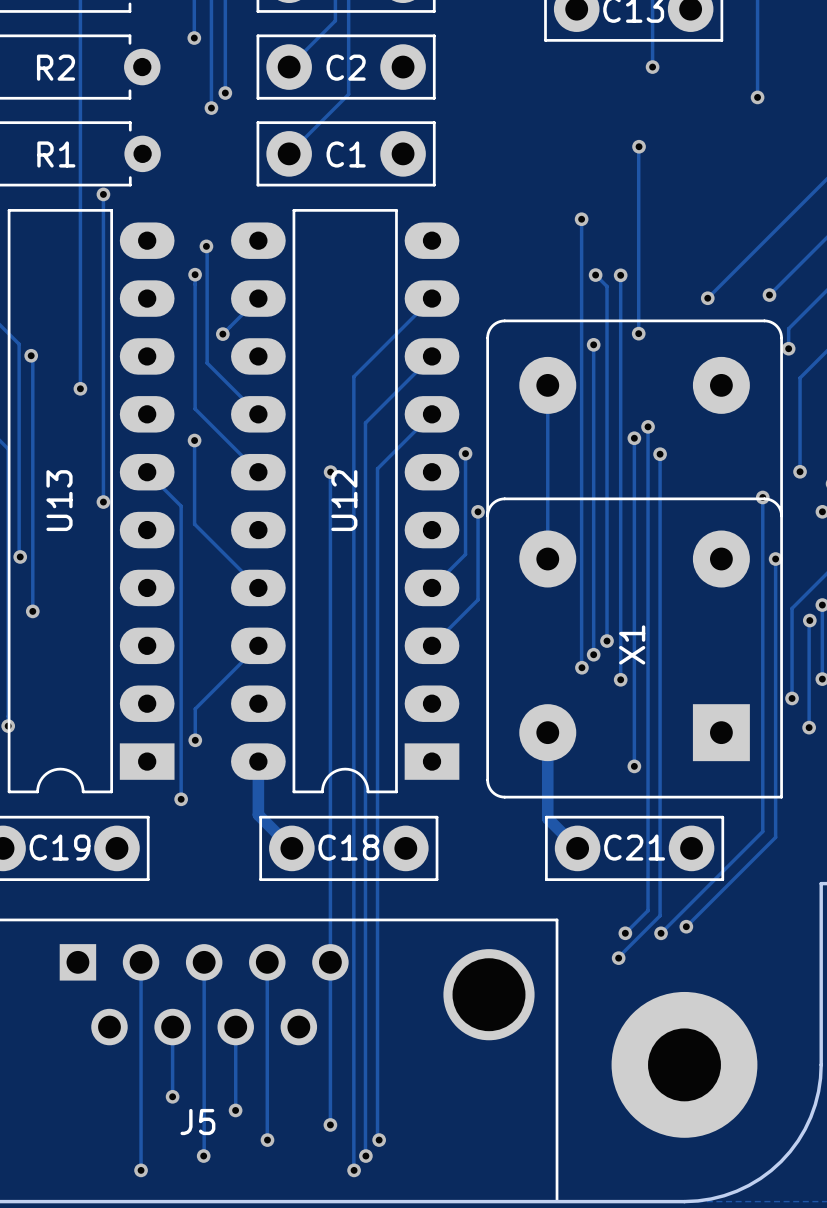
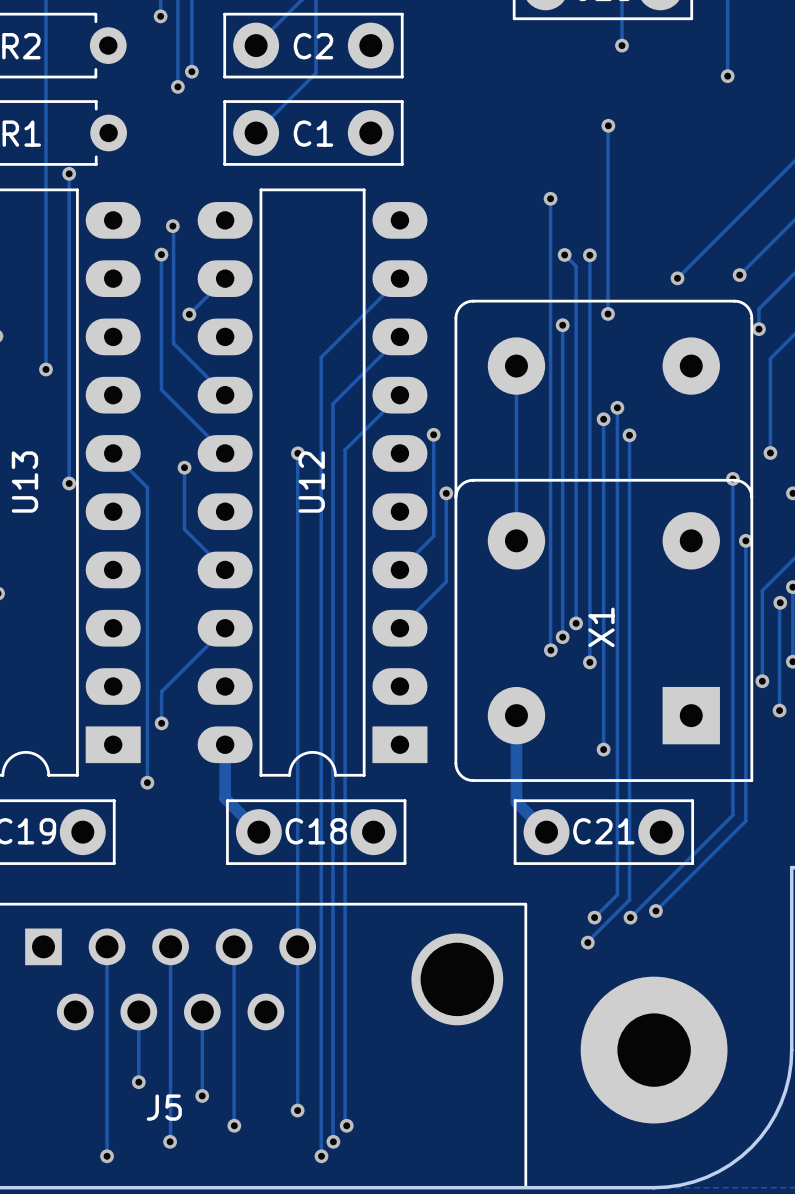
track: (194, 440) (194, 524) (218, 547) -> (184, 467) (184, 529)
via position: (194, 440) -> (184, 467)

